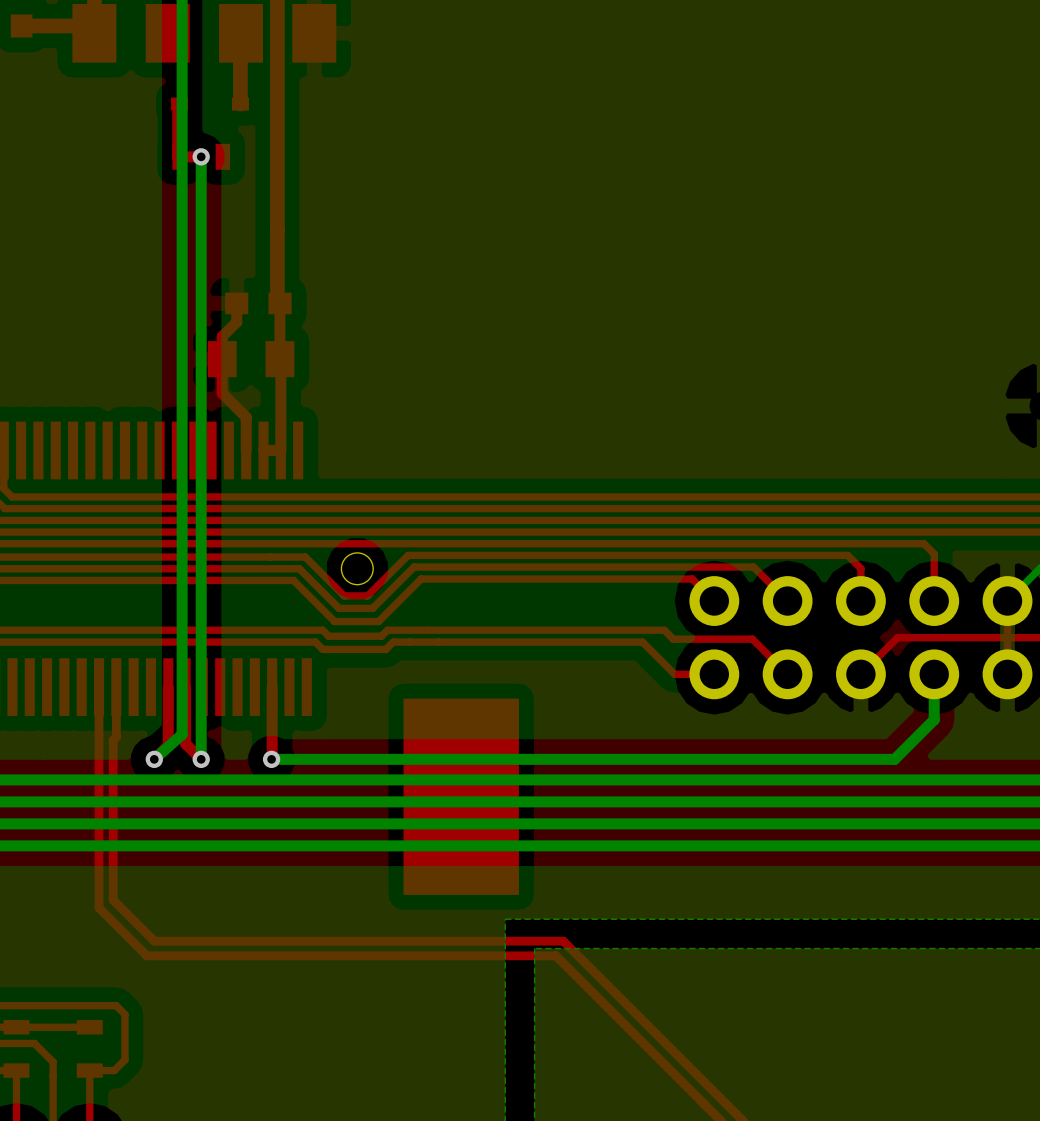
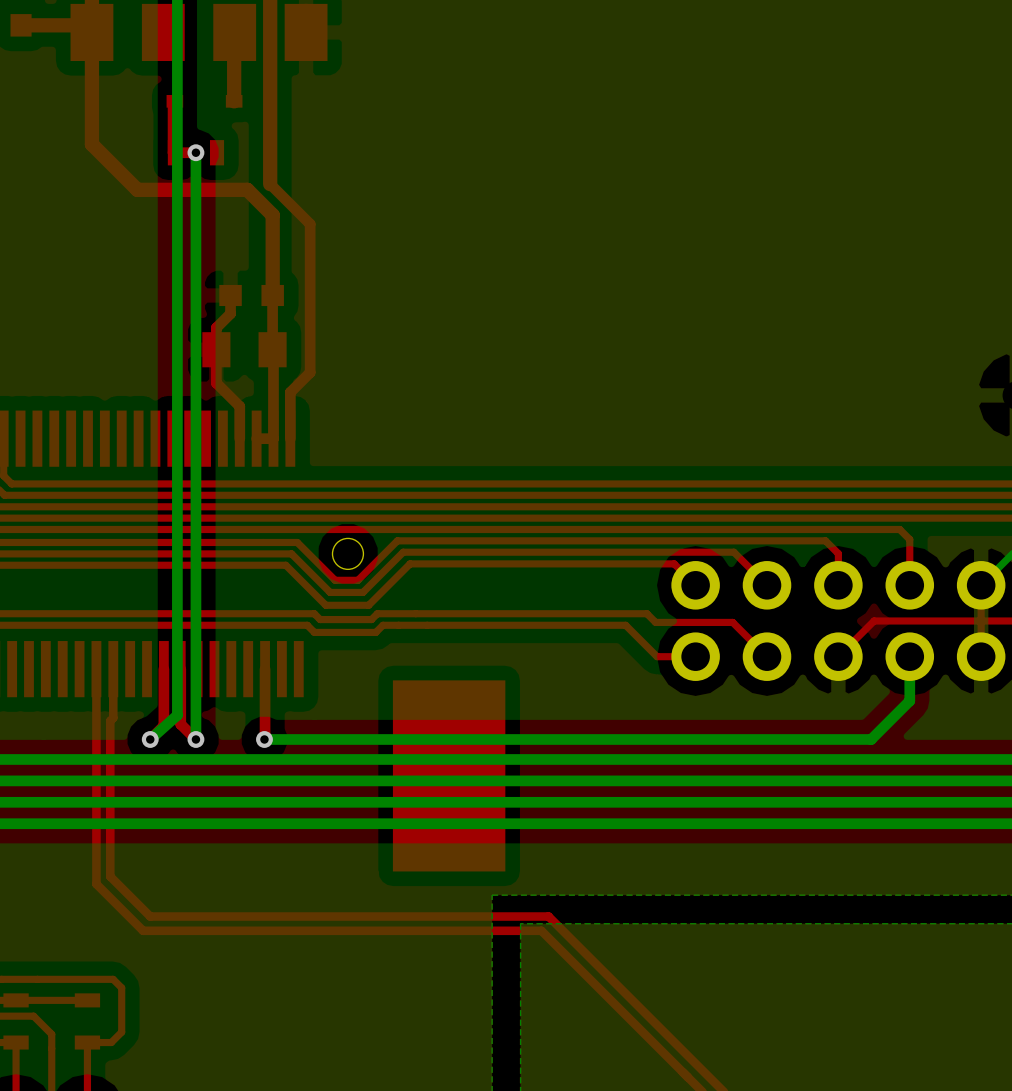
top track: none -> (91, 32) (91, 144) (137, 189) (247, 189) (272, 215) (272, 295)
top track: (277, 189) (277, 300) -> (270, 184) (310, 224) (310, 372) (290, 392) (290, 438)

